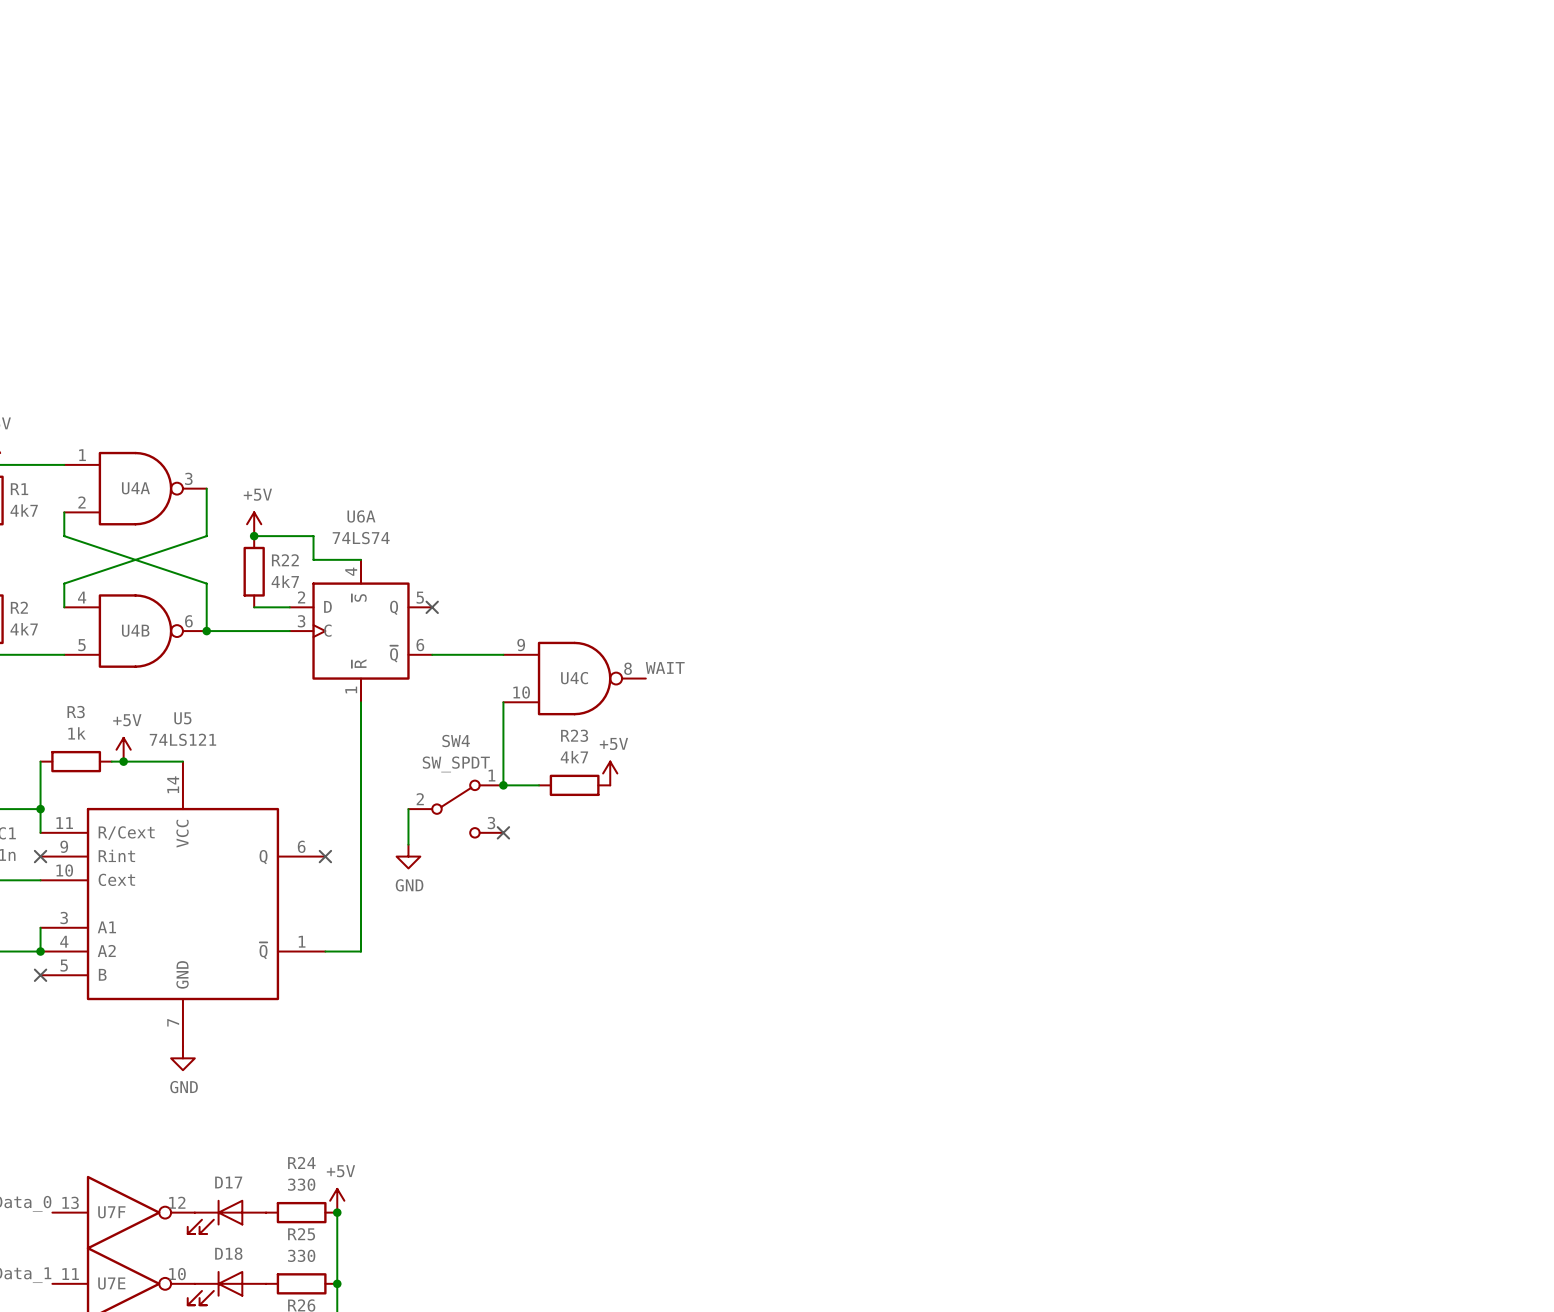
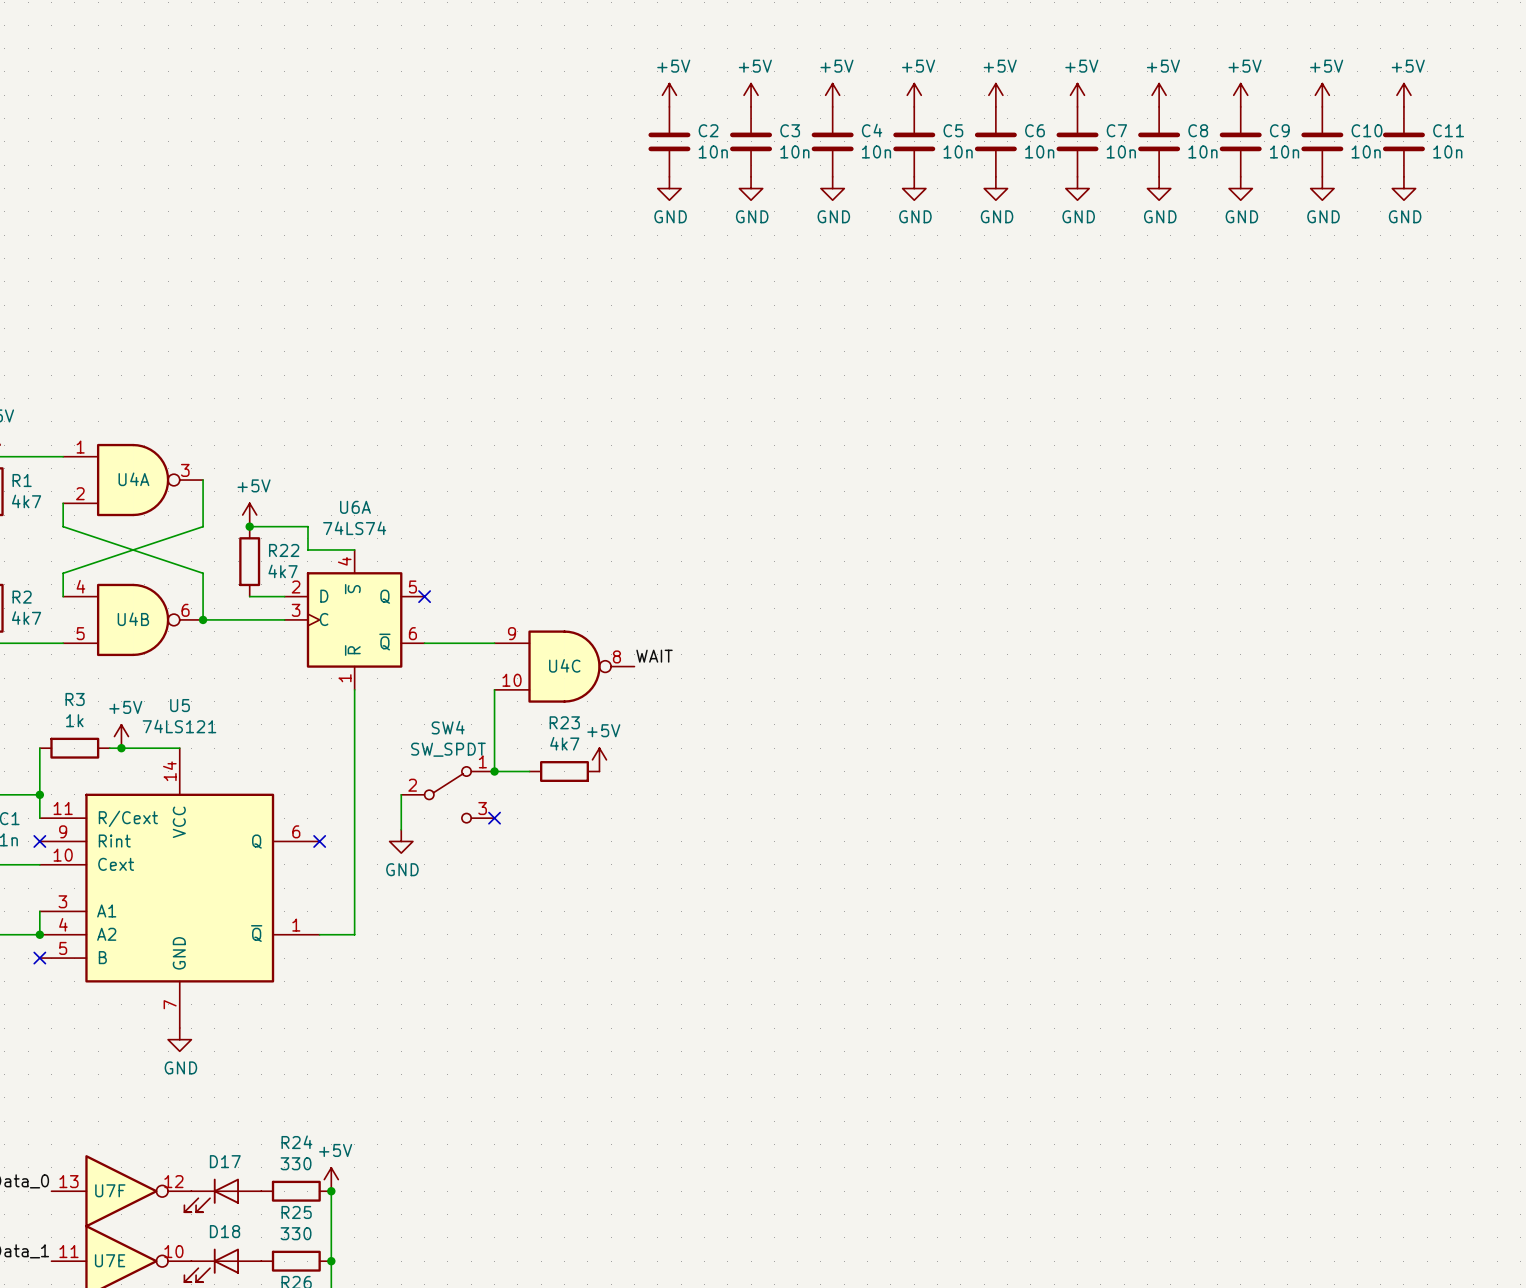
power symbol: none -> +5V (669, 95)
power symbol: none -> +5V (751, 95)
power symbol: none -> +5V (832, 95)
power symbol: none -> +5V (914, 95)
power symbol: none -> +5V (995, 95)
power symbol: none -> +5V (1077, 95)
power symbol: none -> +5V (1159, 95)
power symbol: none -> +5V (1240, 95)
power symbol: none -> +5V (1322, 95)
power symbol: none -> +5V (1403, 95)
C2: none -> 10n (669, 141)
C3: none -> 10n (751, 141)
C4: none -> 10n (832, 141)
C5: none -> 10n (914, 141)
C6: none -> 10n (995, 141)
C7: none -> 10n (1077, 141)
C8: none -> 10n (1159, 141)
C9: none -> 10n (1240, 141)
C10: none -> 10n (1322, 141)
C11: none -> 10n (1403, 141)
power symbol: none -> GND (669, 188)
power symbol: none -> GND (751, 188)
power symbol: none -> GND (832, 188)
power symbol: none -> GND (914, 188)
power symbol: none -> GND (995, 188)
power symbol: none -> GND (1077, 188)
power symbol: none -> GND (1159, 188)
power symbol: none -> GND (1240, 188)
power symbol: none -> GND (1322, 188)
power symbol: none -> GND (1403, 188)

